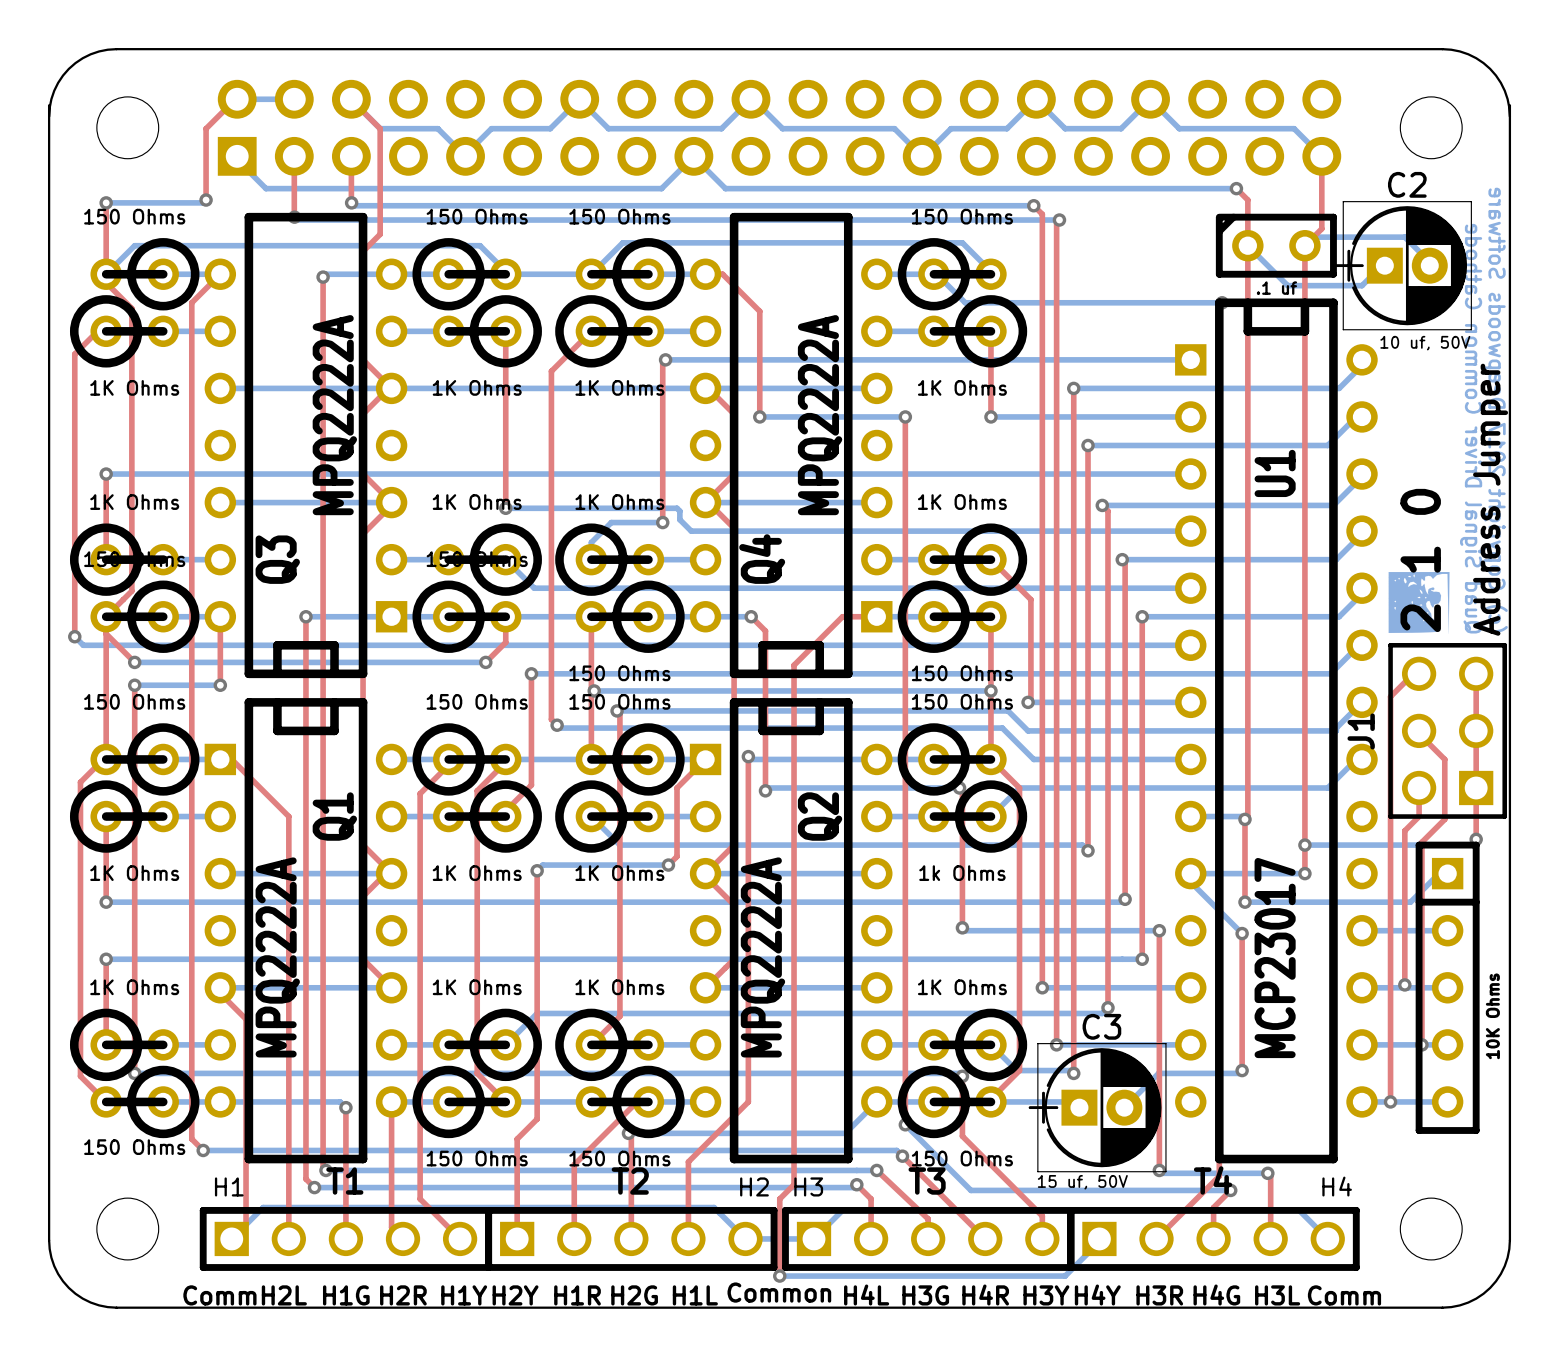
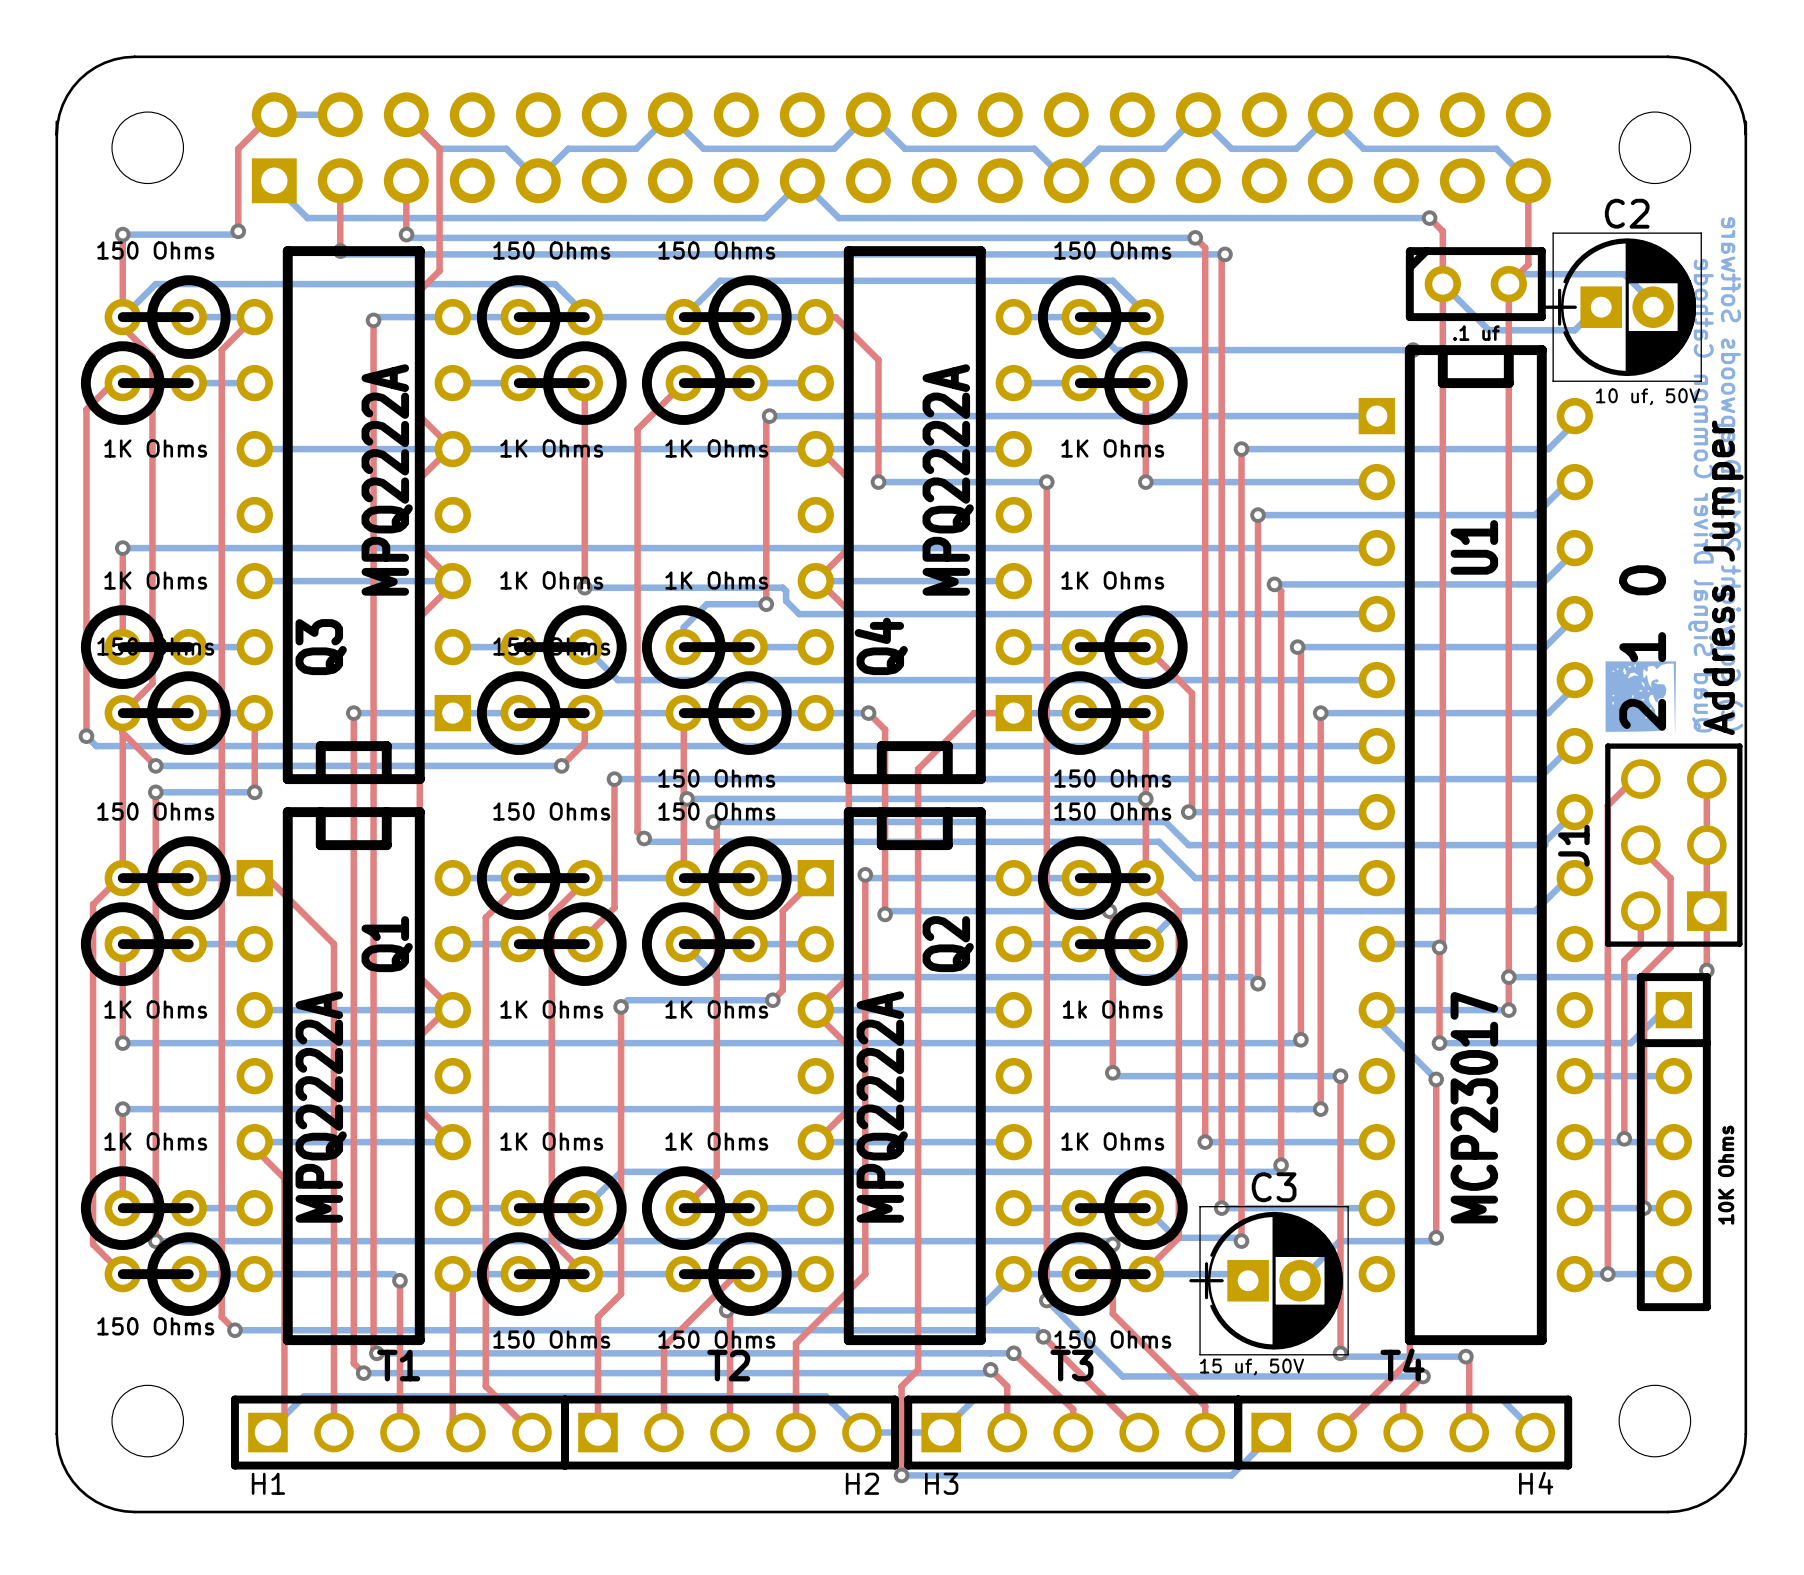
T1 value position: H1 (229, 1186) -> H1 (268, 1483)
T2 value position: H2 (754, 1186) -> H2 (862, 1483)
T3 value position: H3 (808, 1186) -> H3 (941, 1483)
T4 value position: H4 (1337, 1186) -> H4 (1536, 1483)
text: Common (779, 1292) -> none
text: Comm (219, 1295) -> none
text: H2L (284, 1295) -> none
text: H1G (346, 1295) -> none
text: H2R (403, 1295) -> none
text: H1Y (464, 1295) -> none
text: H2Y (515, 1295) -> none
text: H1R (577, 1295) -> none
text: H2G (634, 1295) -> none
text: H1L (695, 1295) -> none
text: H4L (866, 1295) -> none
text: H3G (925, 1295) -> none
text: H4R (985, 1295) -> none
text: H3Y (1046, 1295) -> none
text: H4Y (1097, 1295) -> none
text: H3R (1159, 1295) -> none
text: H4G (1216, 1295) -> none
text: H3L (1277, 1295) -> none
text: Comm (1344, 1295) -> none

